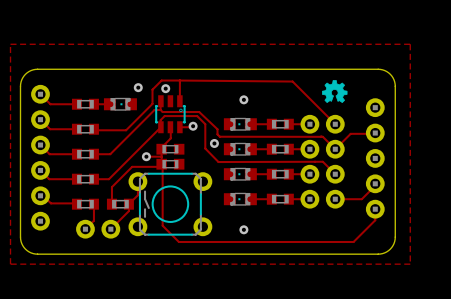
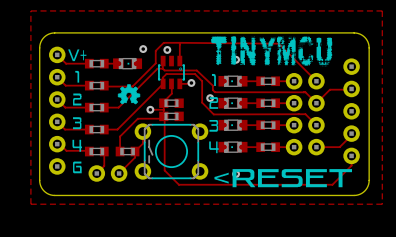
drawing: none -> [211, 36, 333, 86]
drawing: none -> [68, 49, 87, 83]
drawing position: (334, 91) -> (129, 94)
drawing: none -> [73, 93, 82, 106]
drawing: none -> [209, 97, 219, 109]
drawing: none -> [73, 117, 82, 130]
drawing: none -> [209, 119, 219, 154]
drawing: none -> [72, 139, 82, 174]
drawing: none -> [214, 169, 353, 188]

